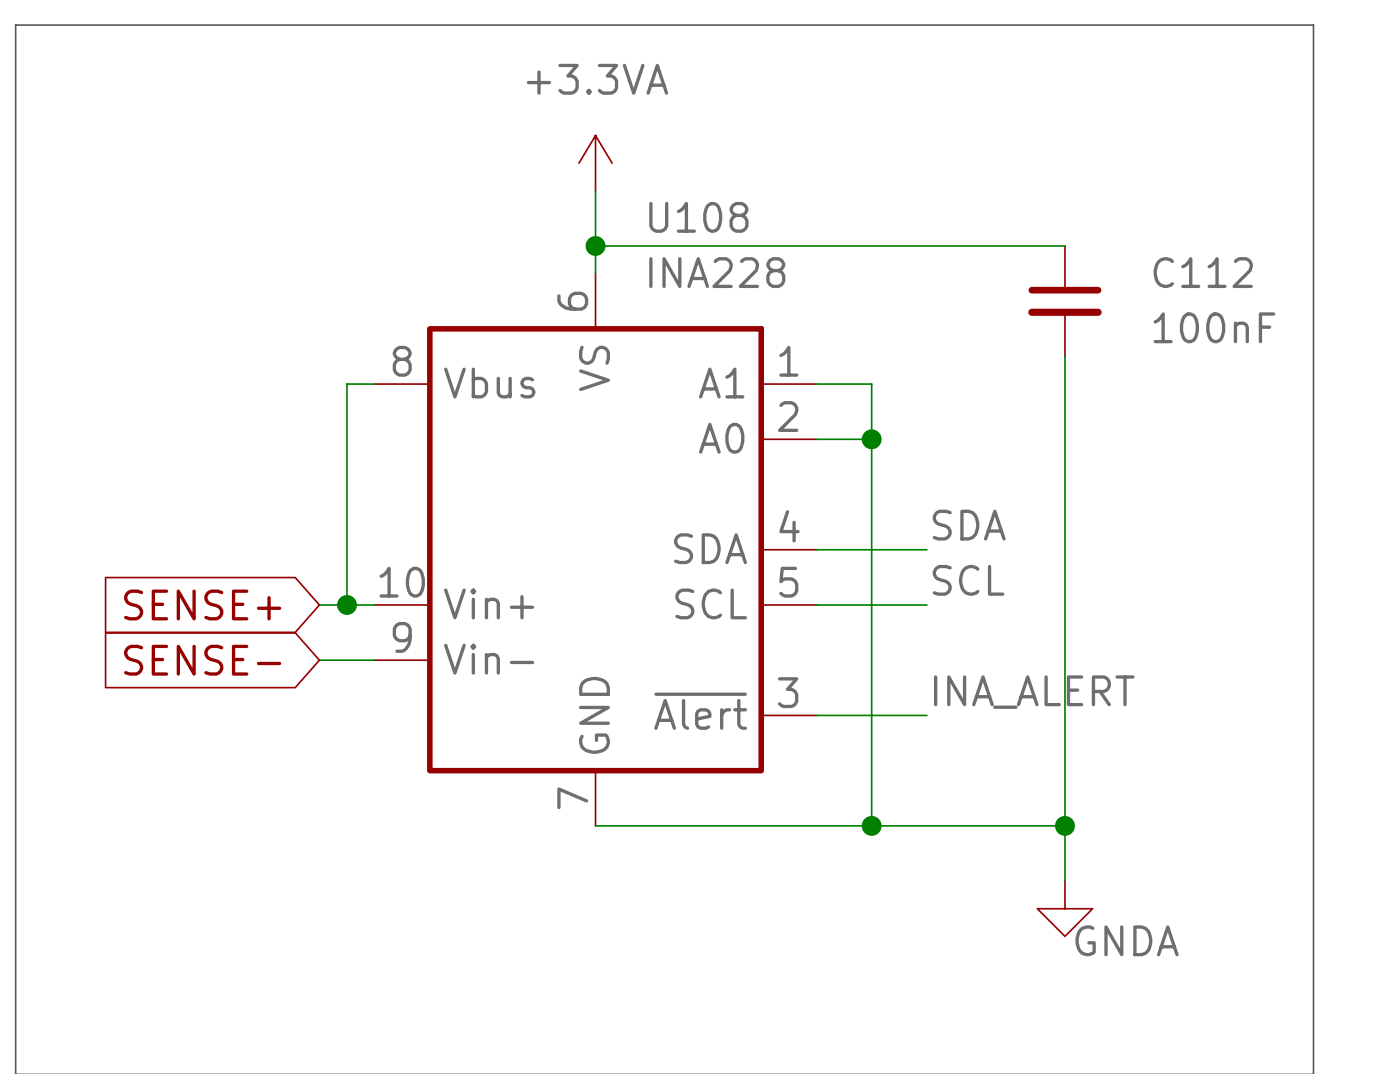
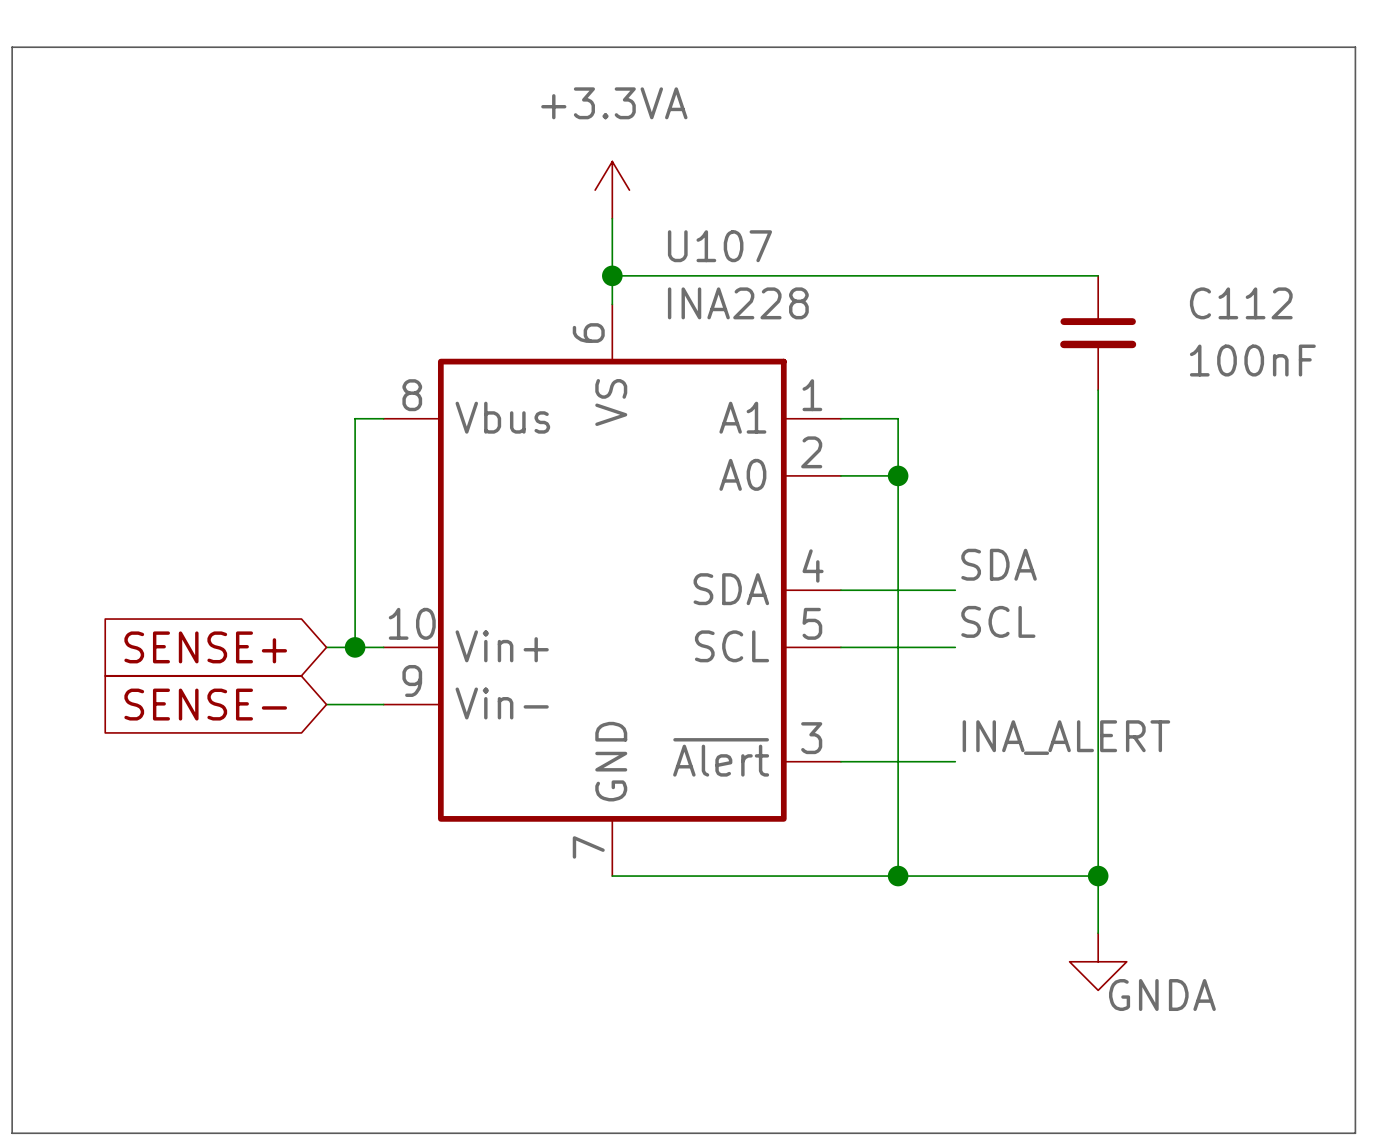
U108 name: U108 (698, 217) -> U107 (719, 246)

